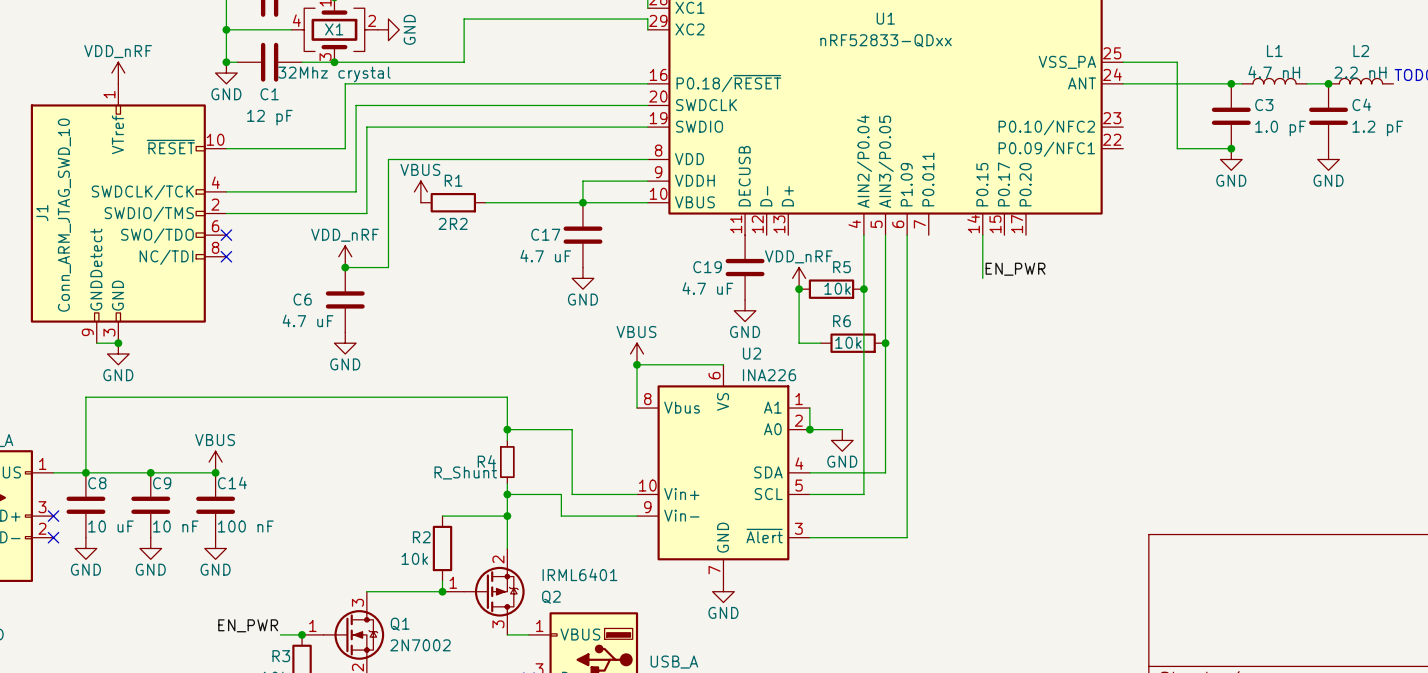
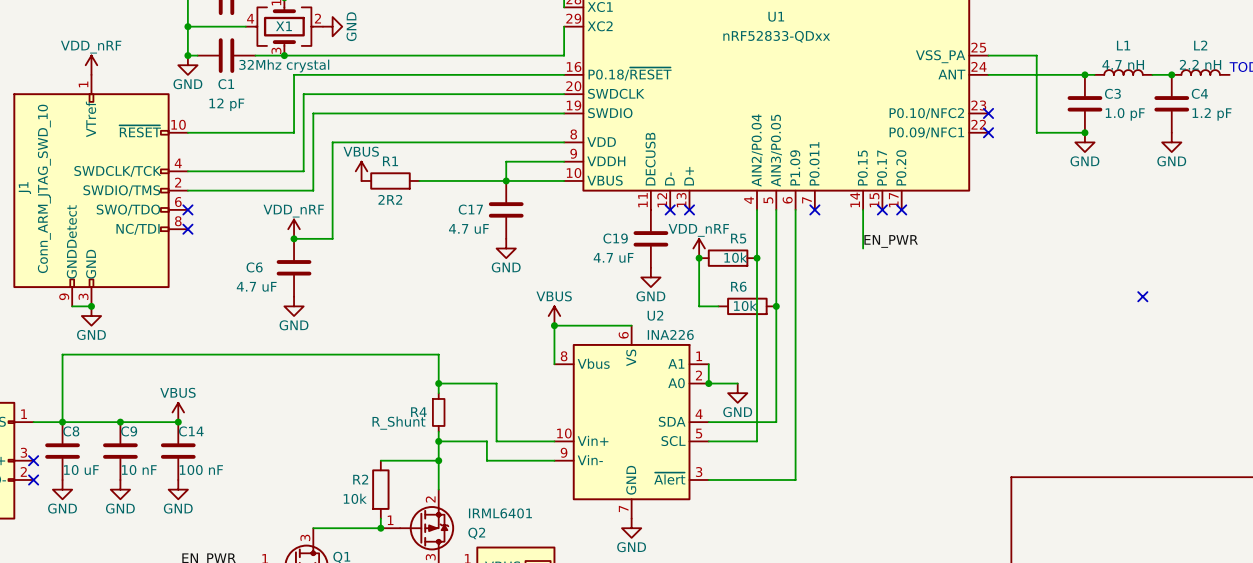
wire: (647, 29) (647, 19) (464, 19) (464, 62) -> (564, 26) (564, 55) (400, 55)
no-connect mark: none -> (988, 113)
no-connect mark: none -> (988, 132)
no-connect mark: none -> (670, 209)
no-connect mark: none -> (689, 209)
no-connect mark: none -> (814, 209)
no-connect mark: none -> (882, 209)
no-connect mark: none -> (901, 209)
no-connect mark: none -> (1142, 296)

